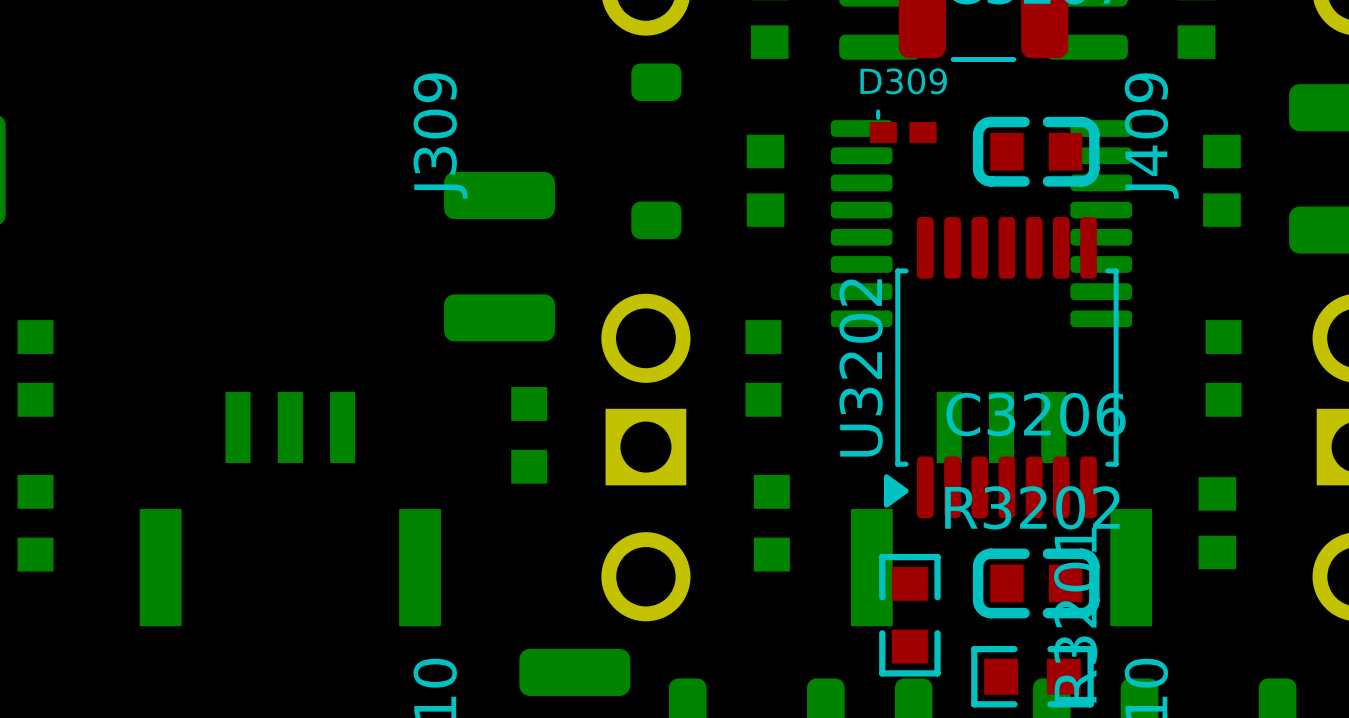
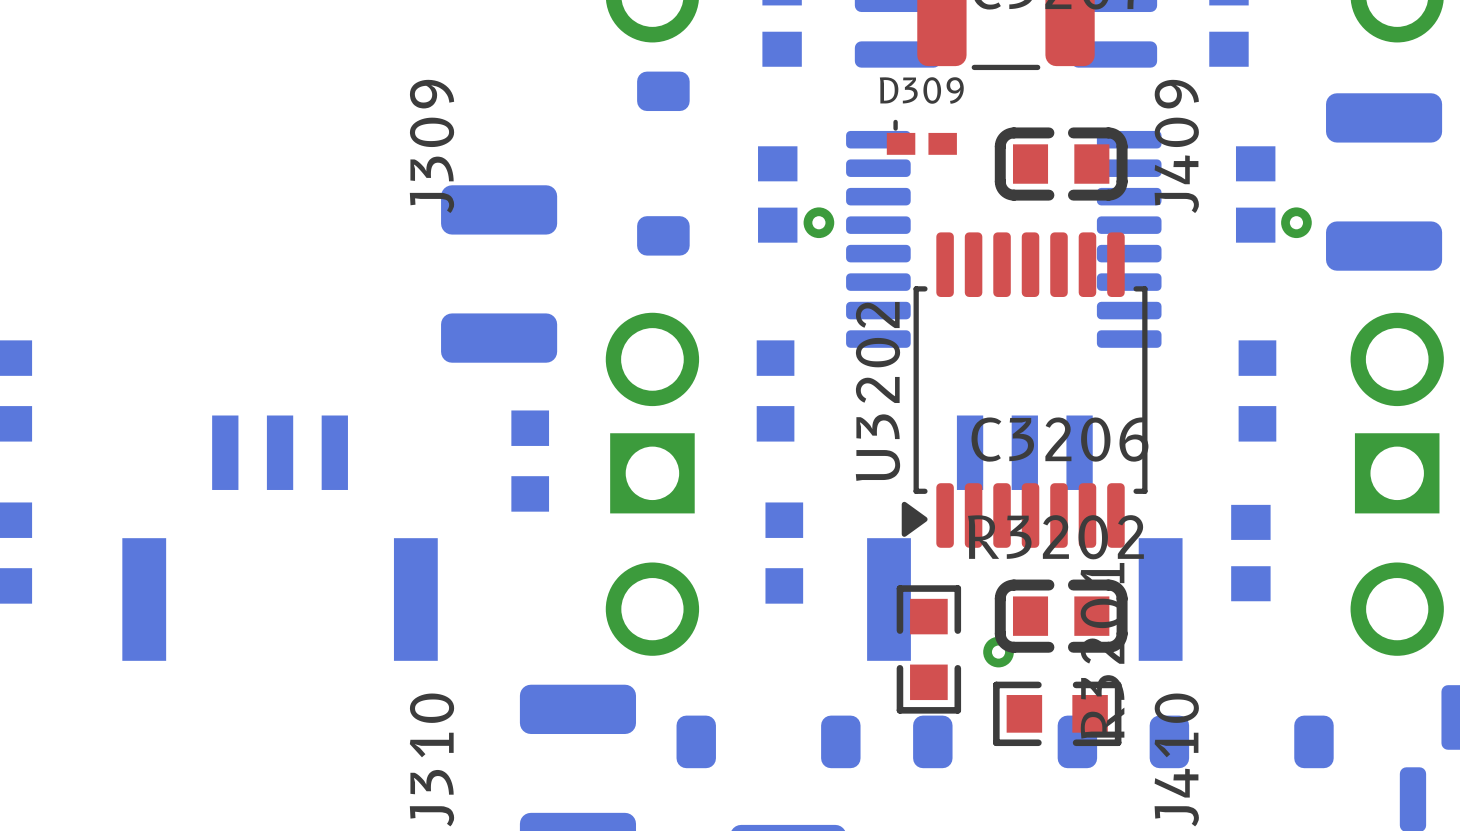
via: none -> (818, 222)
via: none -> (1296, 222)
via: none -> (998, 652)

